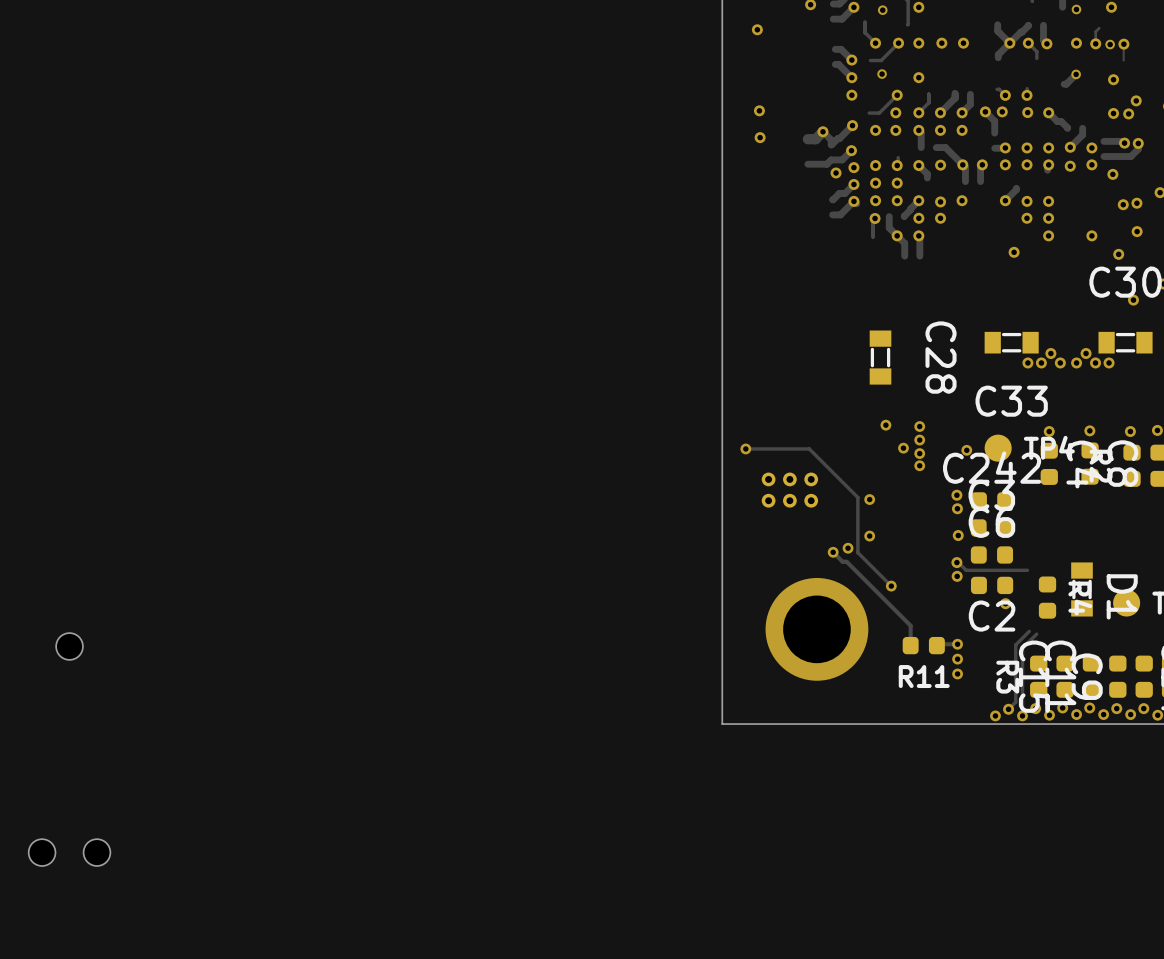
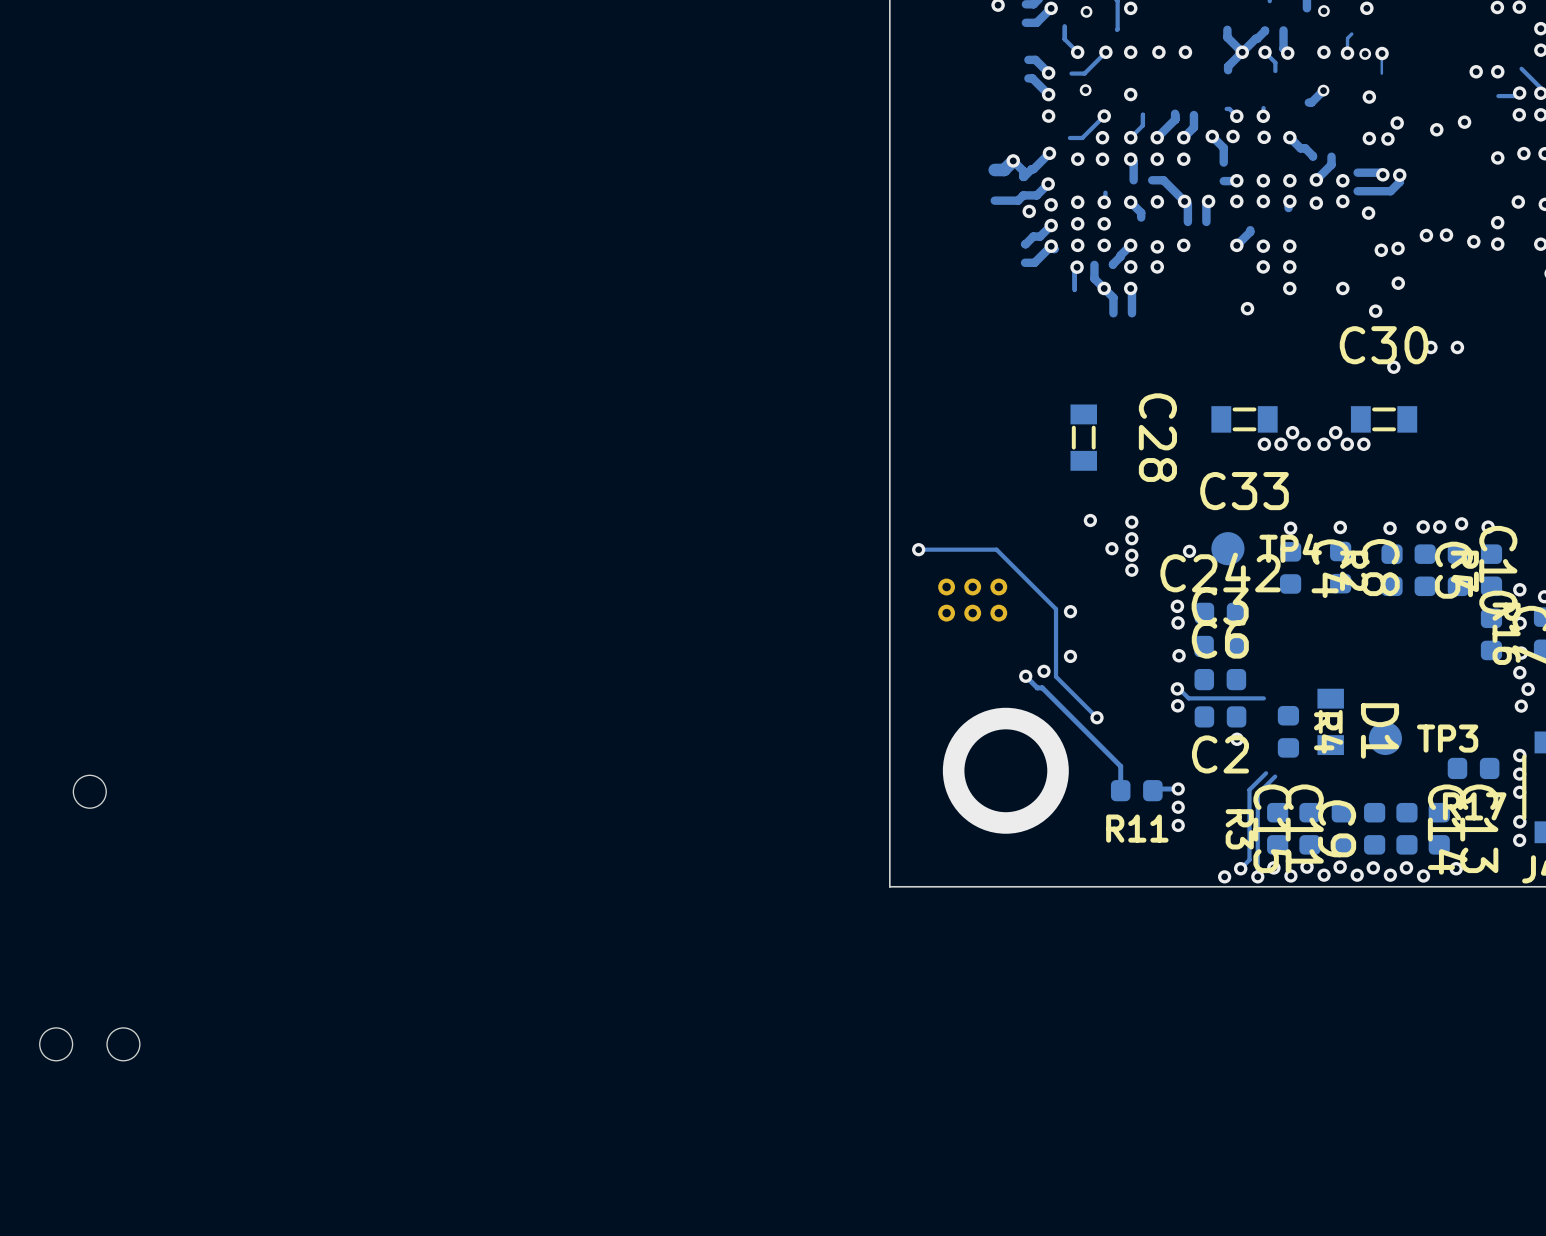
via: (757, 29) -> none
via: (759, 110) -> none
via: (760, 137) -> none

